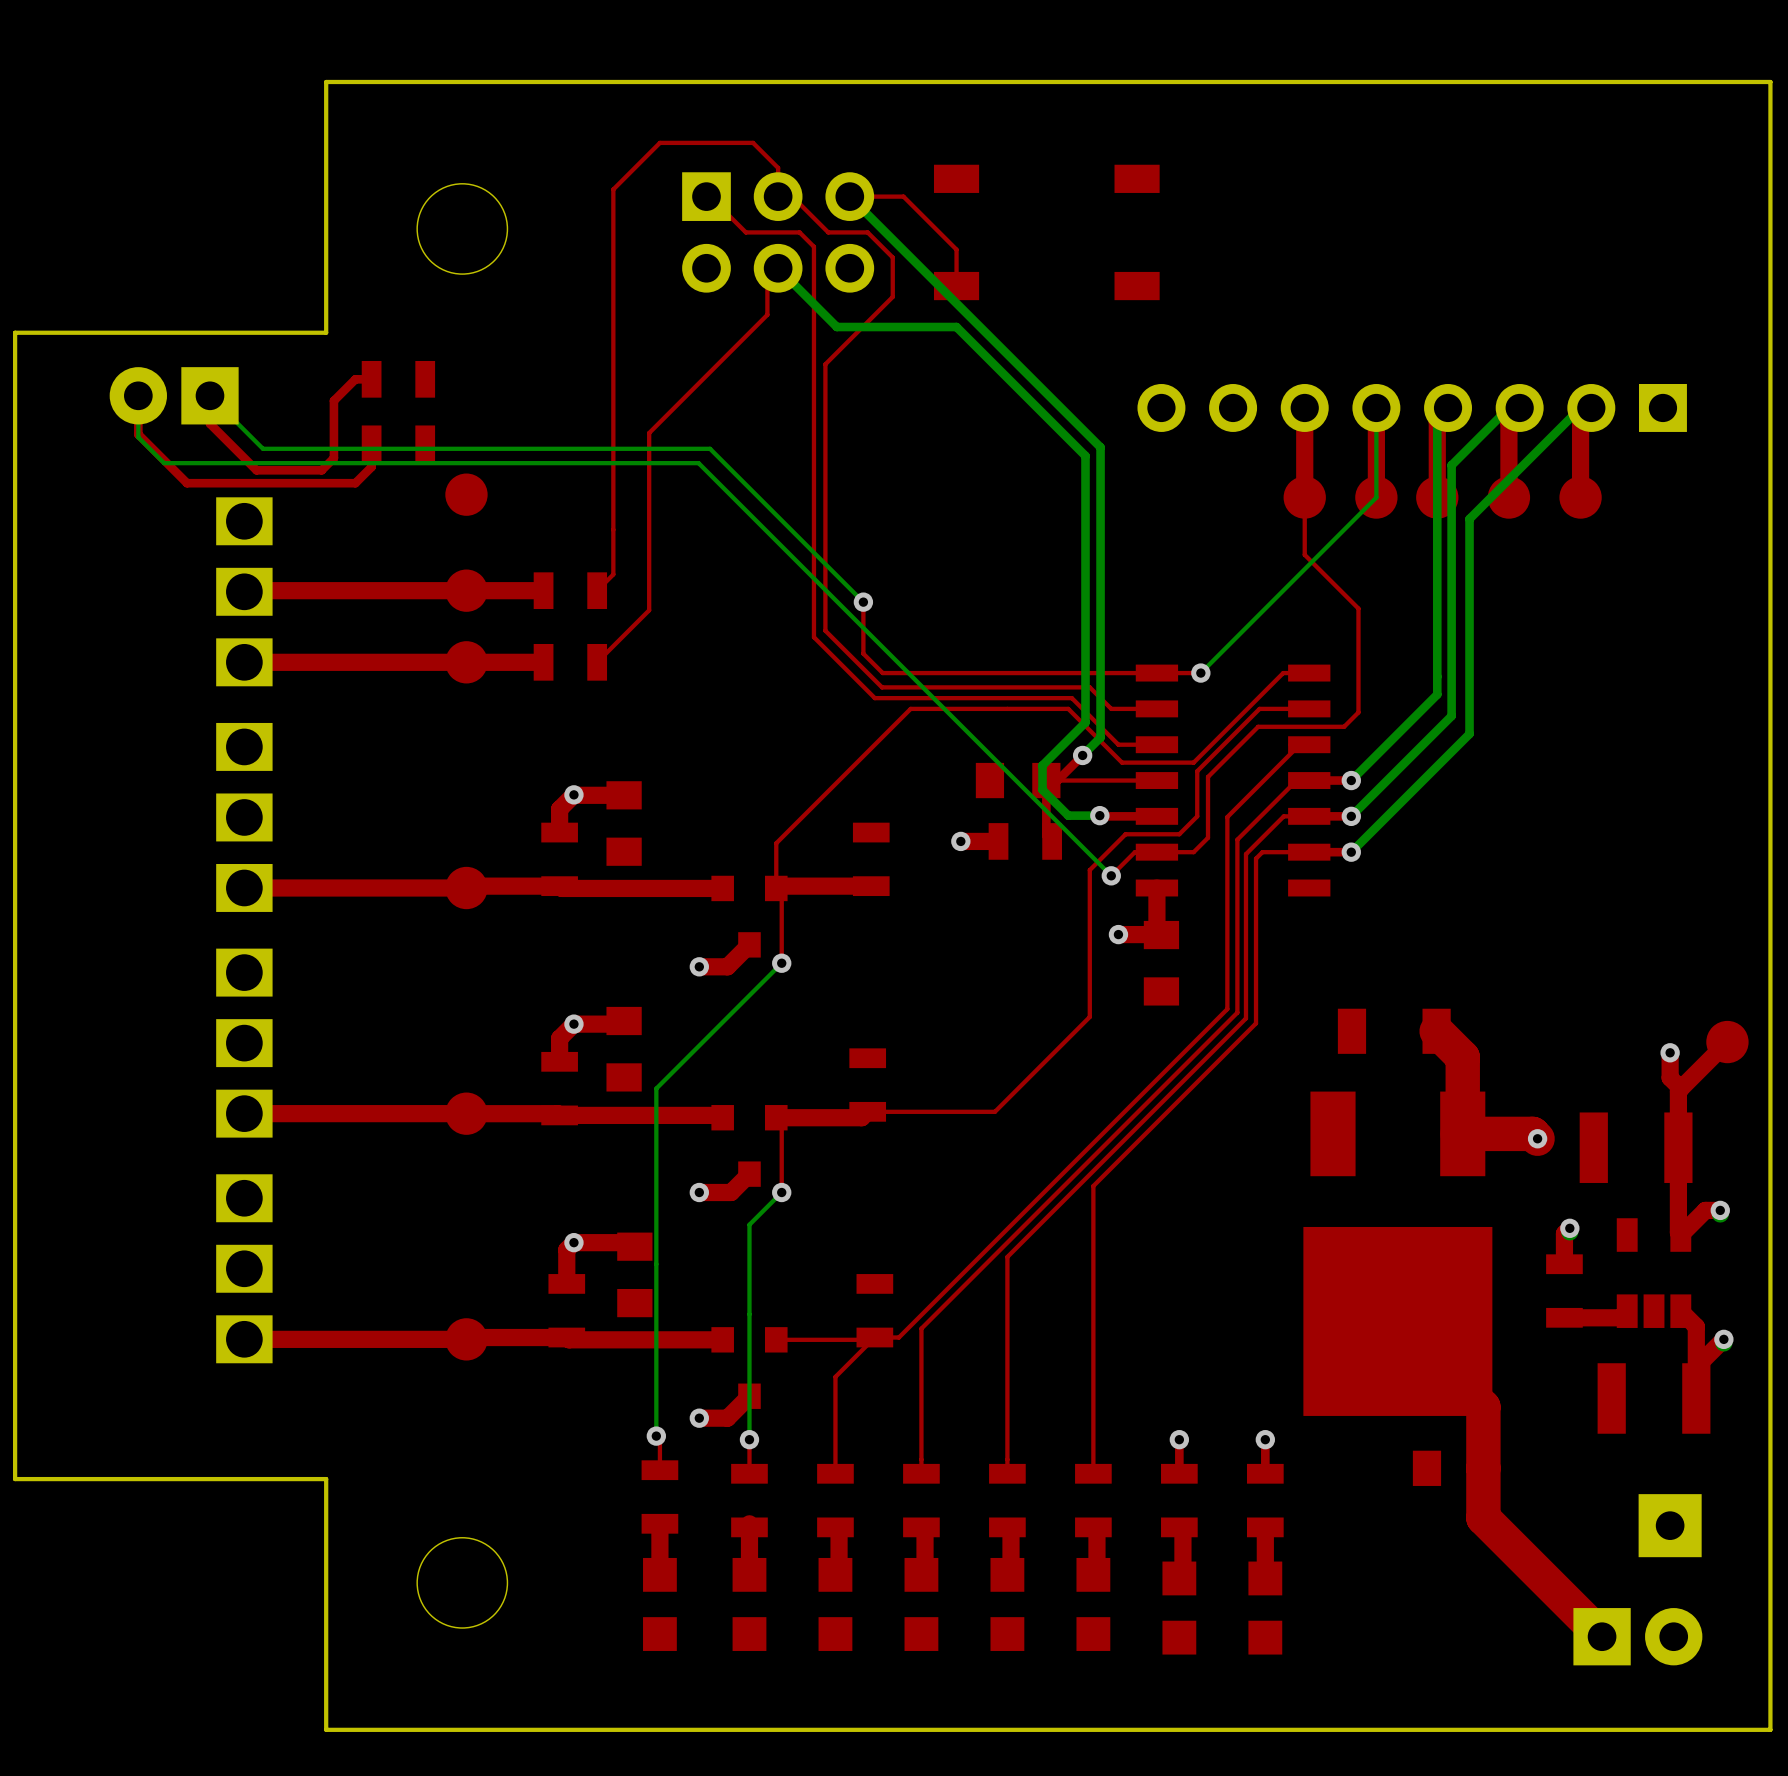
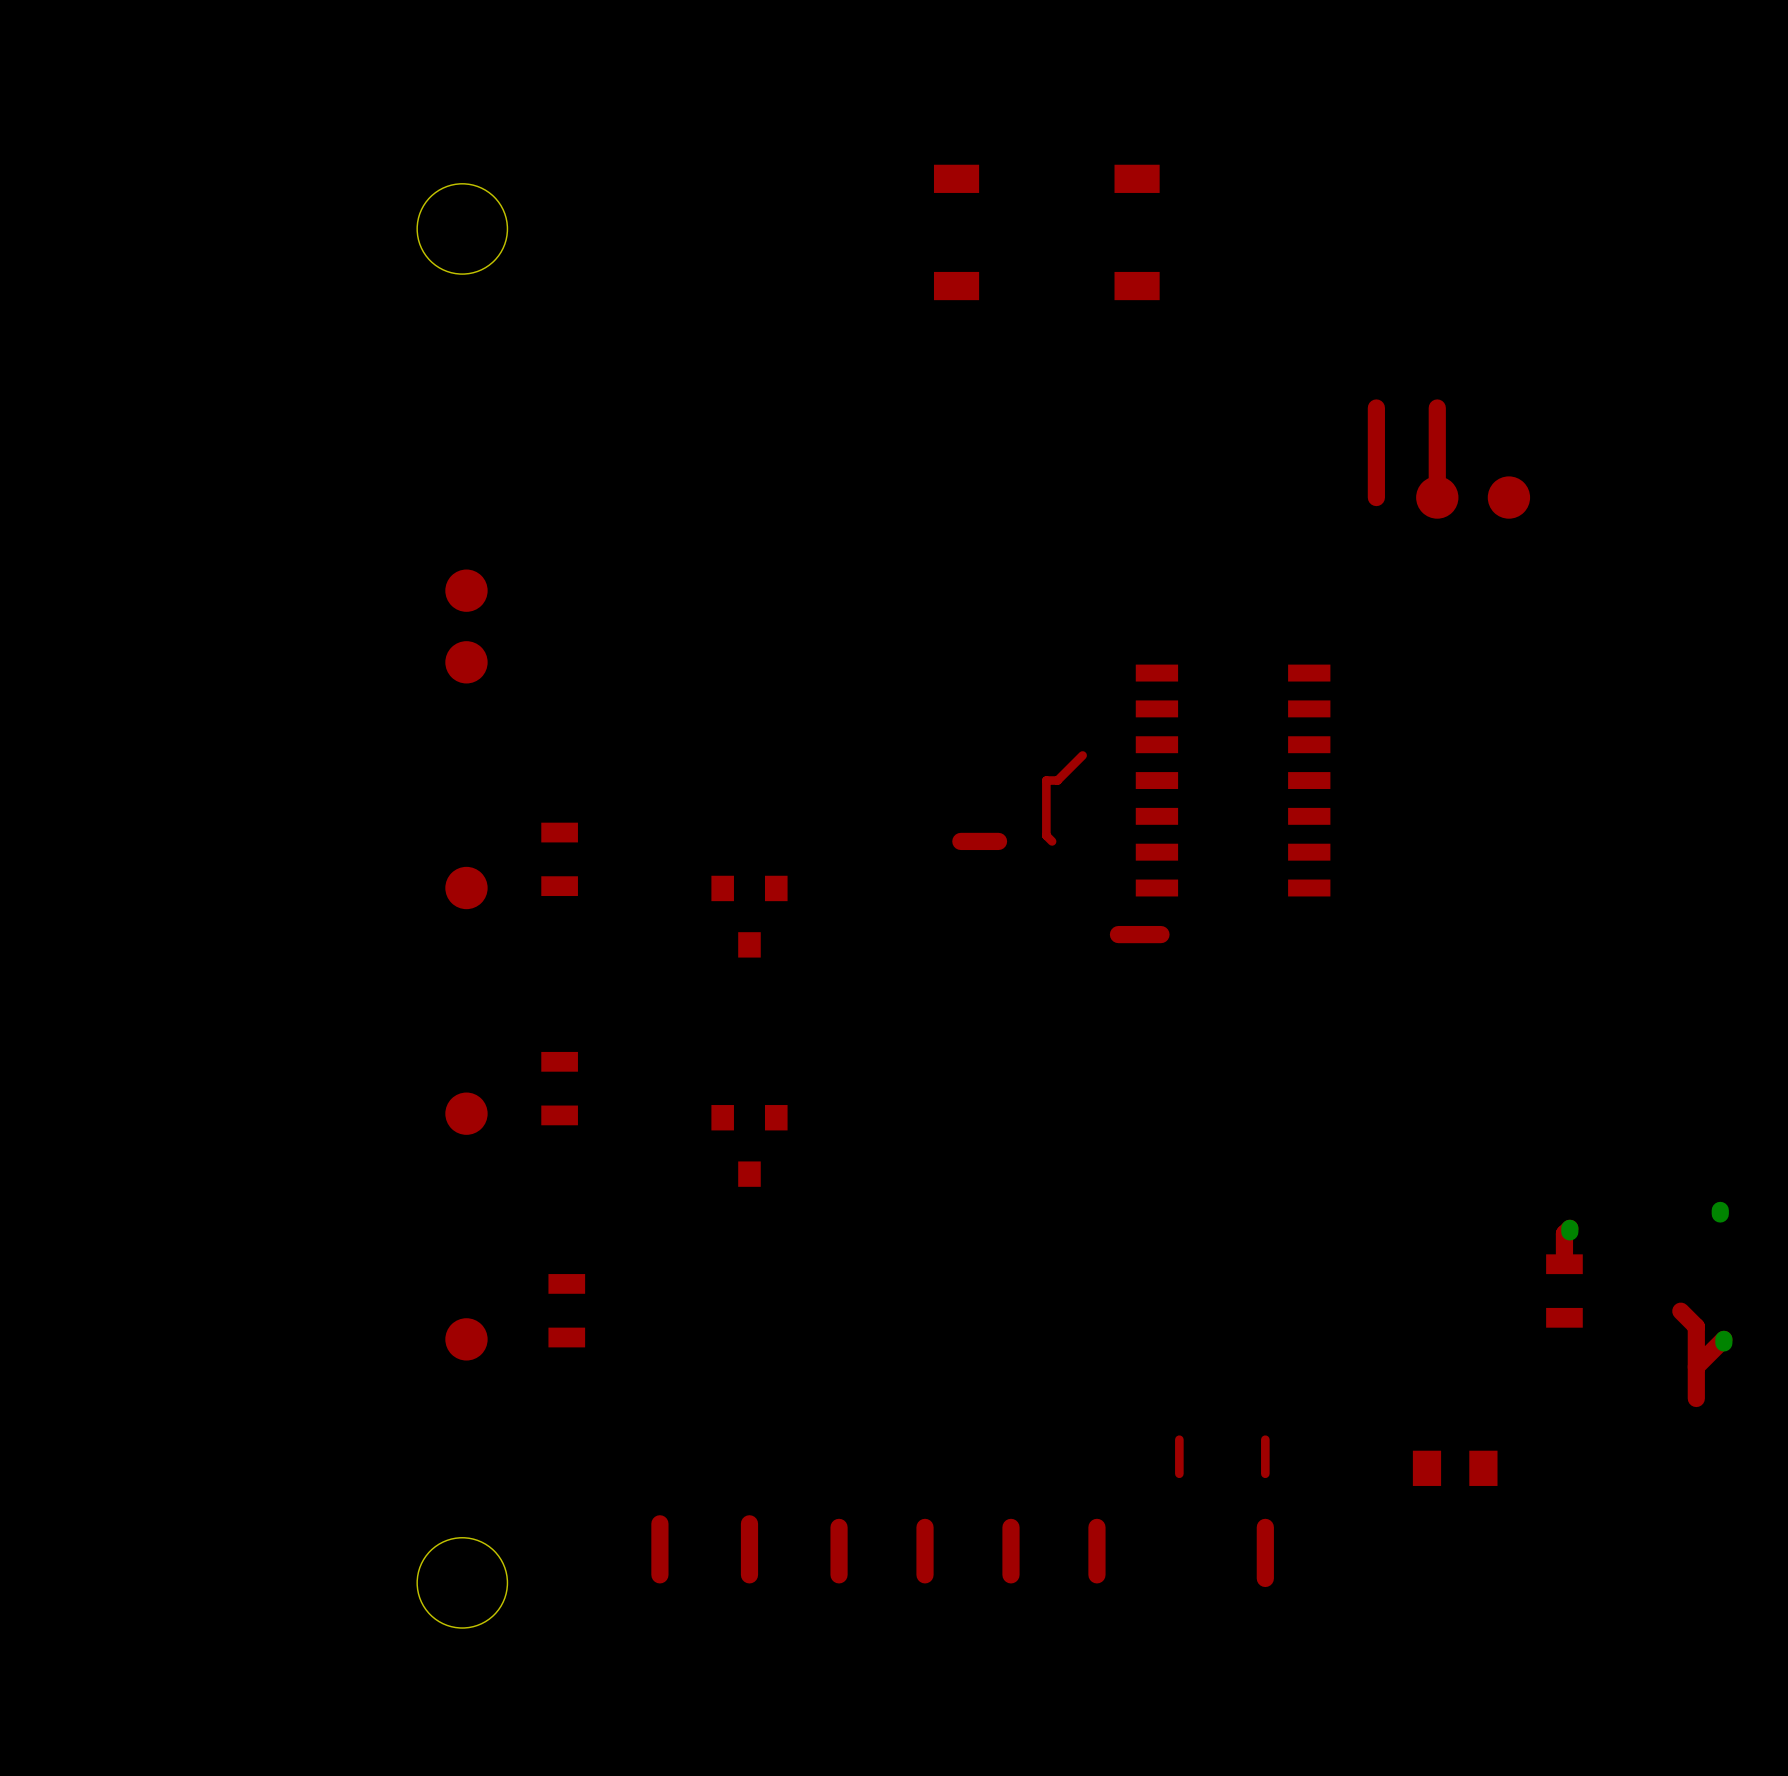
board edge: (1770, 81) (1770, 1729) (326, 1729) (326, 1479) (15, 1479) (15, 332) (326, 332) (326, 81) (1770, 81) -> none
top track: (706, 196) (710, 196) (745, 232) (799, 232) (813, 246) (813, 637) (874, 698) (1071, 698) (1118, 744) (1156, 744) -> none
top track: (849, 196) (903, 196) (956, 249) (956, 286) -> none
bottom track: (849, 196) (1100, 447) (1100, 737) (1082, 755) -> none
part: (778, 232) -> none
top track: (770, 268) (778, 268) (767, 279) (767, 314) (649, 433) (649, 610) (597, 662) -> none
bottom track: (784, 268) (778, 268) (836, 327) (956, 327) (1085, 455) (1085, 722) (1042, 765) (1042, 789) (1068, 815) (1099, 815) -> none
top track: (371, 379) (355, 379) (333, 400) (333, 458) (321, 470) (256, 470) (209, 423) (209, 395) (225, 380) -> none
part: (398, 379) -> none
bottom track: (138, 395) (138, 437) (164, 463) (698, 463) (1111, 875) -> none
part: (174, 395) -> none
bottom track: (209, 395) (263, 448) (710, 448) (863, 602) -> none
top track: (136, 397) (138, 395) (138, 434) (187, 483) (355, 483) (371, 467) (371, 443) -> none
top track: (1304, 407) (1304, 554) (1358, 608) (1358, 712) (1344, 726) (1258, 726) (1208, 776) (1208, 837) (1193, 852) (1134, 852) (1111, 875) -> none
bottom track: (1376, 407) (1376, 497) (1200, 673) -> none
part: (1412, 407) -> none
bottom track: (1437, 407) (1437, 694) (1351, 780) -> none
top track: (1508, 407) (1508, 497) -> none
bottom track: (1508, 407) (1451, 465) (1451, 716) (1351, 816) -> none
top track: (1580, 407) (1580, 497) -> none
bottom track: (1580, 407) (1469, 519) (1469, 733) (1351, 852) -> none
part: (398, 443) -> none
part: (466, 494) -> none
part: (1304, 497) -> none
part: (1376, 497) -> none
part: (1580, 497) -> none
top track: (543, 590) (244, 591) -> none
part: (570, 590) -> none
top track: (597, 590) (613, 574) (613, 189) (659, 142) (753, 142) (778, 167) (778, 196) (792, 196) (828, 232) (867, 232) (892, 257) (892, 296) (825, 364) (825, 630) (882, 687) (1089, 687) (1111, 708) (1156, 708) -> none
part: (244, 591) -> none
top track: (863, 602) (863, 653) (882, 673) (1200, 673) -> none
via: (863, 602) -> none
top track: (543, 662) (244, 662) -> none
part: (570, 662) -> none
via: (1200, 673) -> none
top track: (1309, 673) (1283, 673) (1193, 762) (1122, 762) (1068, 708) (910, 708) (776, 843) (776, 888) -> none
top track: (1309, 708) (1259, 708) (1197, 771) (1197, 816) (1179, 834) (1125, 834) (1089, 870) (1089, 1016) (994, 1111) (867, 1111) (861, 1117) (776, 1117) (781, 1123) (781, 1192) -> none
top track: (1299, 744) (1227, 817) (1227, 1009) (898, 1337) (874, 1337) (835, 1376) (835, 1473) -> none
via: (1082, 755) -> none
part: (1018, 780) -> none
top track: (1156, 780) (1046, 780) -> none
top track: (1351, 780) (1296, 780) (1237, 839) (1237, 1012) (921, 1328) (921, 1473) -> none
via: (1351, 780) -> none
via: (573, 794) -> none
top track: (624, 795) (573, 794) (559, 809) (559, 832) -> none
top track: (1099, 815) (1156, 816) -> none
via: (1099, 815) -> none
top track: (1351, 816) (1283, 816) (1245, 854) (1245, 1018) (1007, 1256) (1007, 1473) -> none
via: (1351, 816) -> none
part: (244, 817) -> none
part: (624, 823) -> none
via: (960, 841) -> none
part: (1025, 841) -> none
top track: (1351, 852) (1262, 852) (1256, 858) (1256, 1023) (1093, 1186) (1093, 1473) -> none
via: (1351, 852) -> none
part: (871, 859) -> none
via: (1111, 875) -> none
top track: (871, 886) (778, 886) (776, 888) -> none
top track: (244, 888) (559, 886) (561, 888) (722, 888) -> none
top track: (776, 888) (781, 893) (781, 963) -> none
top track: (1156, 888) (1156, 930) (1161, 935) -> none
via: (1118, 934) -> none
top track: (749, 944) (727, 966) (699, 966) -> none
bottom track: (781, 963) (656, 1088) (656, 1436) -> none
via: (781, 963) -> none
part: (1161, 963) -> none
via: (699, 966) -> none
top track: (624, 1021) (620, 1024) (573, 1024) (559, 1038) (559, 1061) -> none
via: (573, 1024) -> none
part: (1394, 1031) -> none
top track: (1436, 1031) (1462, 1057) (1462, 1133) -> none
top track: (1727, 1042) (1678, 1091) (1678, 1232) (1680, 1235) (1705, 1210) (1720, 1210) -> none
part: (1727, 1042) -> none
part: (244, 1043) -> none
part: (624, 1049) -> none
top track: (1670, 1052) (1670, 1077) (1680, 1088) -> none
via: (1670, 1052) -> none
part: (867, 1085) -> none
top track: (466, 1113) (244, 1113) -> none
top track: (466, 1113) (720, 1115) (722, 1117) -> none
top track: (1457, 1133) (1532, 1133) (1537, 1138) -> none
via: (1537, 1138) -> none
part: (1636, 1147) -> none
top track: (749, 1174) (731, 1192) (699, 1192) -> none
via: (699, 1192) -> none
bottom track: (781, 1192) (749, 1224) (749, 1439) -> none
via: (781, 1192) -> none
via: (1720, 1210) -> none
via: (1569, 1228) -> none
via: (573, 1242) -> none
top track: (634, 1246) (630, 1242) (573, 1242) (566, 1249) (566, 1283) -> none
part: (1397, 1253) -> none
part: (244, 1268) -> none
part: (1654, 1273) -> none
part: (634, 1274) -> none
part: (874, 1310) -> none
top track: (1627, 1311) (1620, 1317) (1564, 1317) -> none
top track: (1397, 1321) (1483, 1406) (1483, 1518) (1602, 1636) -> none
top track: (240, 1337) (242, 1339) (566, 1337) (569, 1339) (722, 1339) -> none
top track: (872, 1339) (776, 1339) -> none
via: (1723, 1339) -> none
part: (749, 1368) -> none
top track: (749, 1396) (727, 1418) (699, 1418) -> none
part: (1654, 1398) -> none
via: (699, 1418) -> none
top track: (656, 1436) (659, 1439) (659, 1470) -> none
via: (656, 1436) -> none
top track: (749, 1439) (749, 1473) -> none
via: (749, 1439) -> none
via: (1179, 1439) -> none
via: (1265, 1439) -> none
part: (659, 1496) -> none
part: (749, 1500) -> none
part: (835, 1500) -> none
part: (921, 1500) -> none
part: (1007, 1500) -> none
part: (1093, 1500) -> none
part: (1179, 1500) -> none
part: (1265, 1500) -> none
part: (1670, 1525) -> none
top track: (1182, 1527) (1182, 1574) -> none
part: (659, 1604) -> none
part: (749, 1604) -> none
part: (835, 1604) -> none
part: (921, 1604) -> none
part: (1007, 1604) -> none
part: (1093, 1604) -> none
part: (1179, 1608) -> none
part: (1265, 1608) -> none
part: (1637, 1636) -> none

